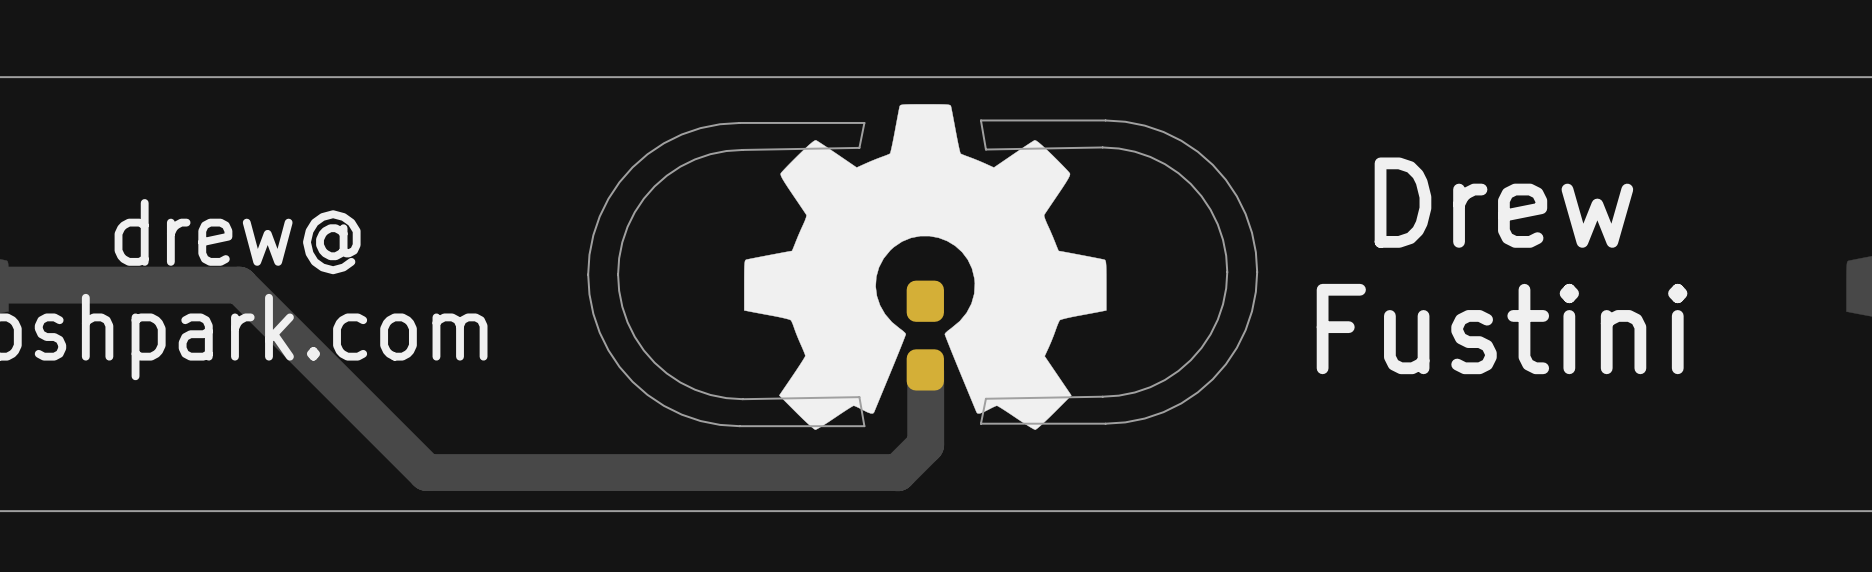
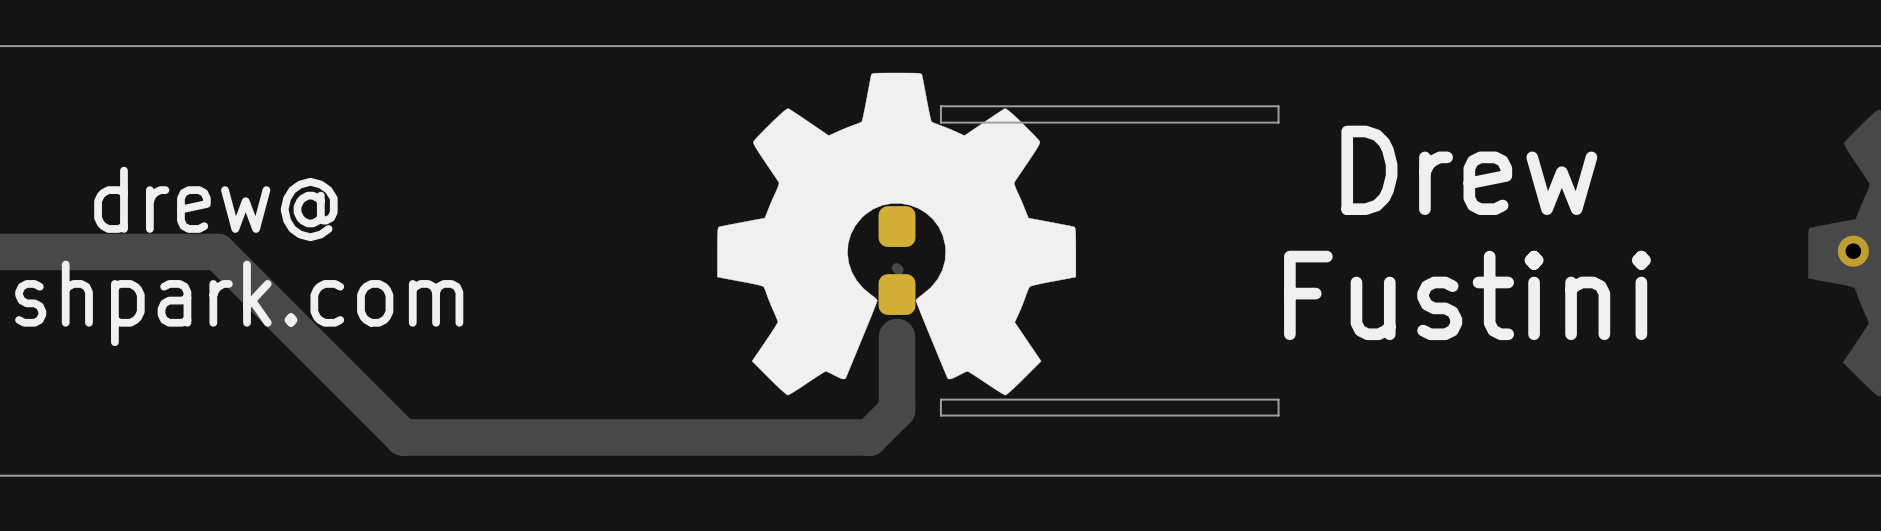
board edge: (980, 120) (985, 149) (1118, 148) (1134, 151) (1164, 164) (1190, 183) (1210, 209) (1223, 239) (1227, 272) (1223, 304) (1210, 334) (1190, 360) (1164, 380) (1150, 387) (1118, 395) (985, 398) (980, 423) (1125, 422) (1163, 412) (1197, 392) (1225, 364) (1236, 347) (1252, 311) (1255, 291) (1255, 252) (1252, 232) (1245, 214) (1225, 179) (1212, 164) (1181, 140) (1144, 125) (1105, 120) (980, 120) -> none
board edge: (739, 122) (864, 122) (859, 147) (726, 151) (695, 159) (666, 175) (654, 186) (634, 212) (622, 242) (618, 274) (622, 306) (627, 322) (634, 336) (654, 362) (680, 382) (695, 389) (710, 394) (742, 399) (859, 397) (864, 426) (739, 426) (700, 421) (681, 414) (663, 405) (632, 381) (619, 366) (599, 332) (589, 294) (589, 254) (593, 235) (608, 198) (632, 167) (663, 143) (700, 128) (739, 122) -> none
board edge: none -> (940, 106) (940, 122) (1278, 122) (1278, 106) (940, 106)
part position: (925, 335) -> (897, 260)
board edge: none -> (940, 399) (940, 415) (1278, 415) (1278, 399) (940, 399)

